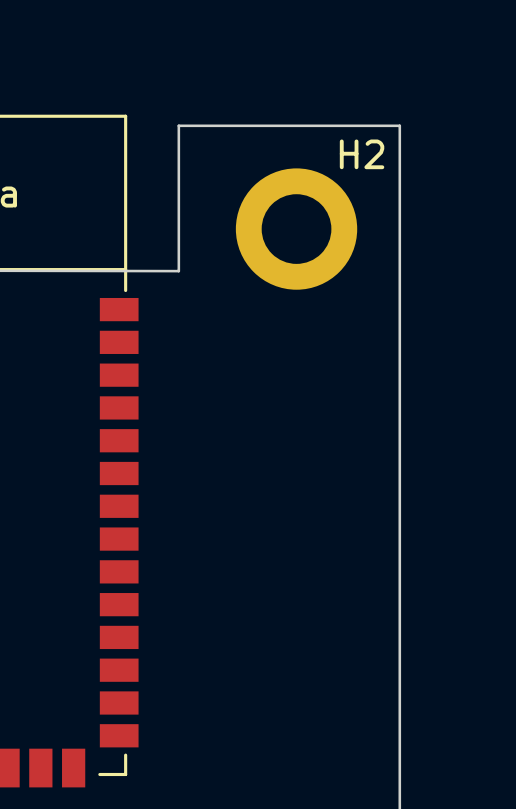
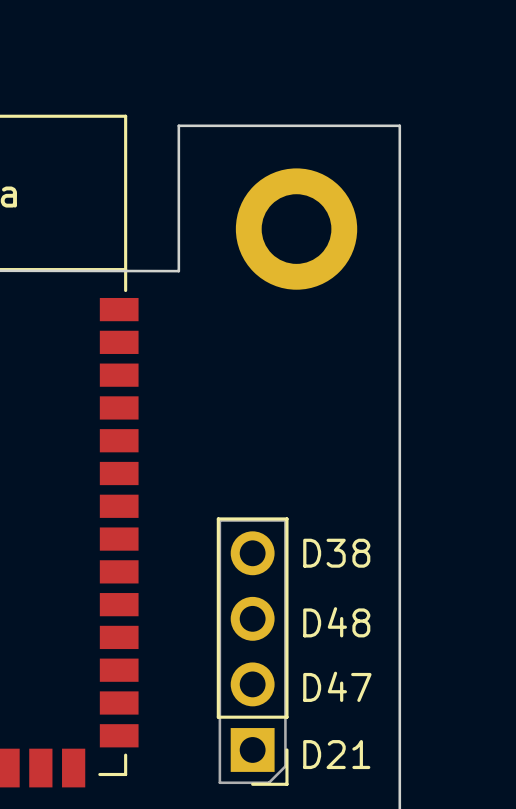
H2 name: H2 (362, 154) -> none
text: none -> D38 (336, 553)
text: none -> D48 (336, 622)
part: none -> (252, 651)
text: none -> D47 (337, 686)
text: none -> D21 (336, 754)

